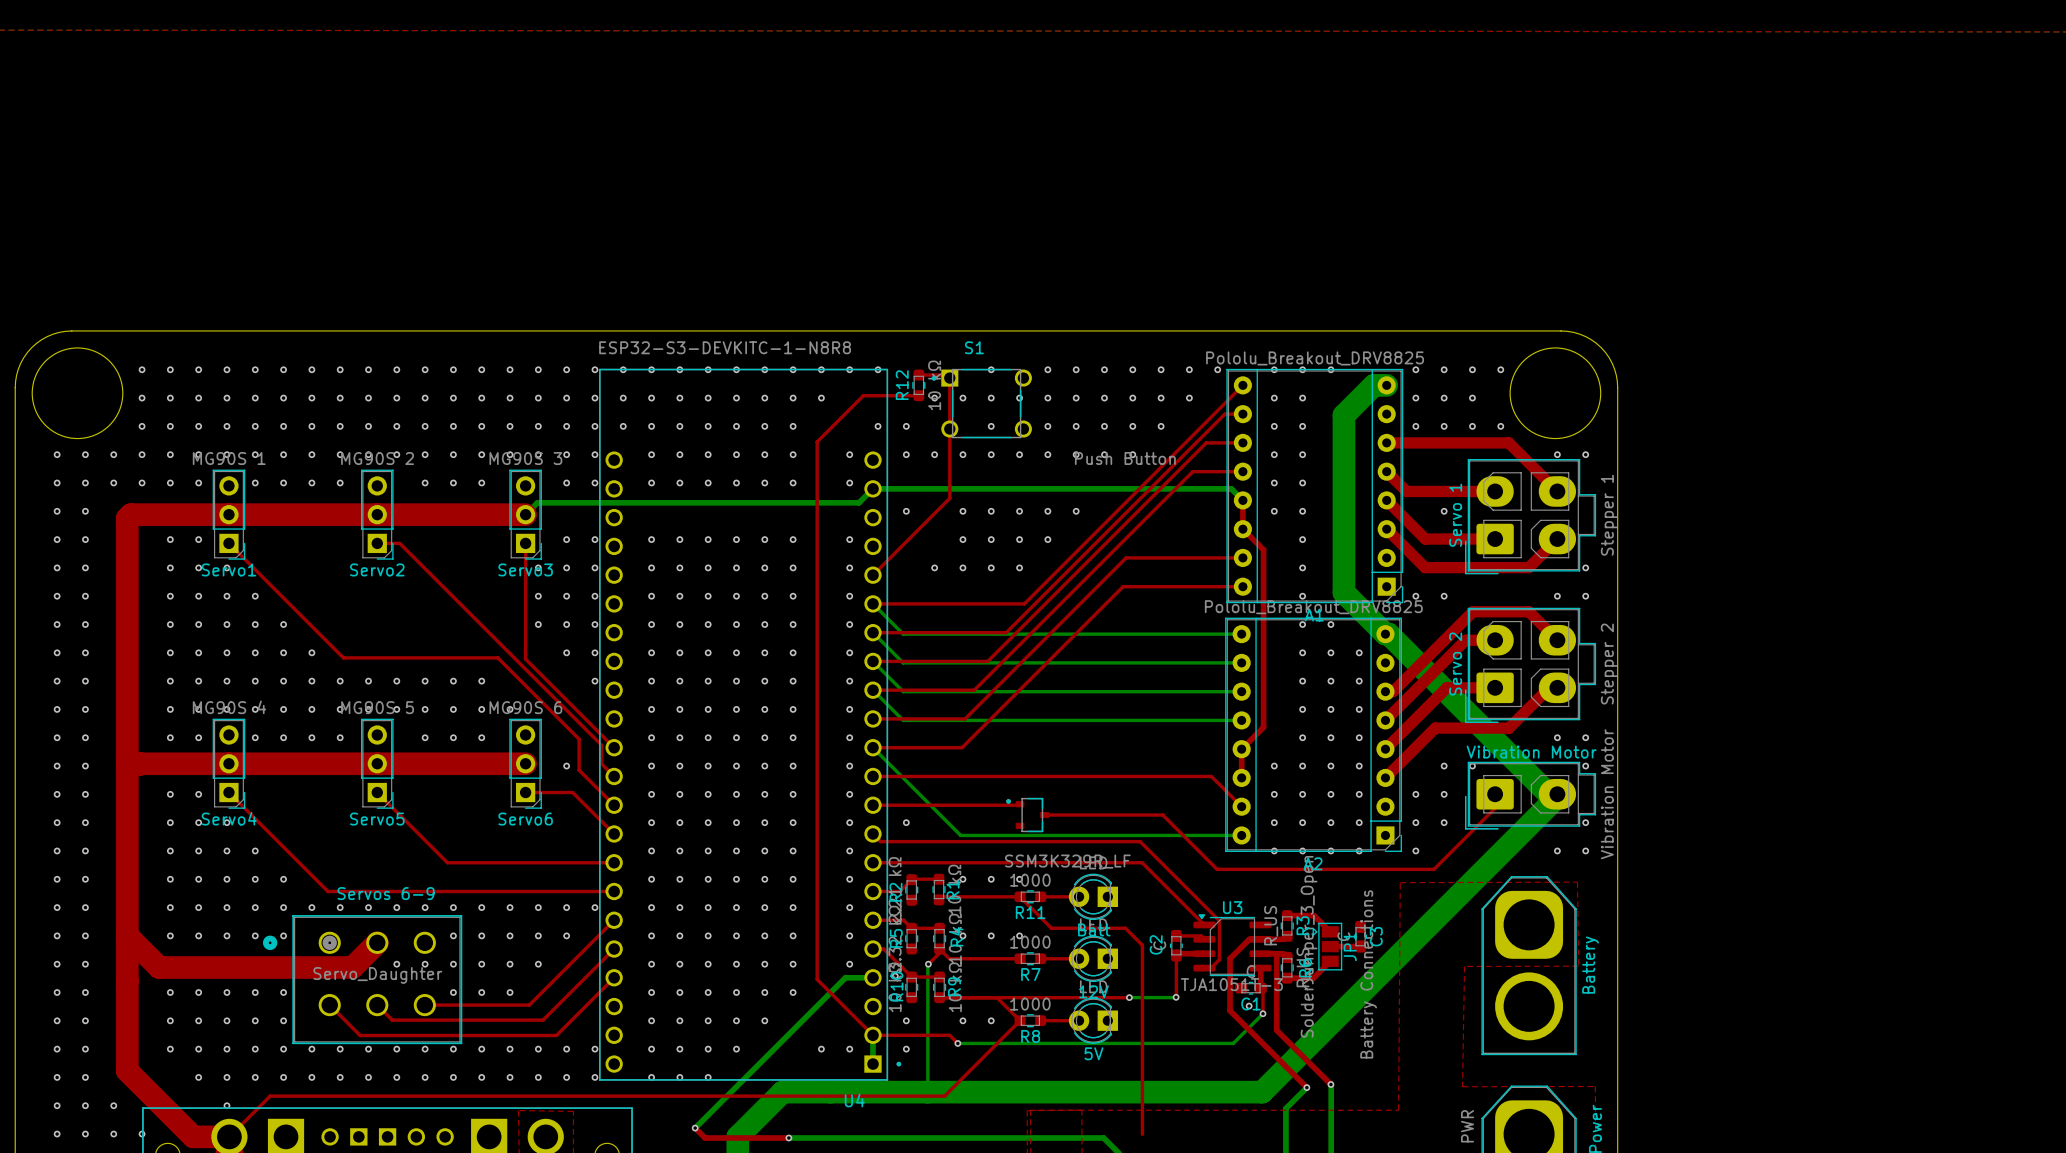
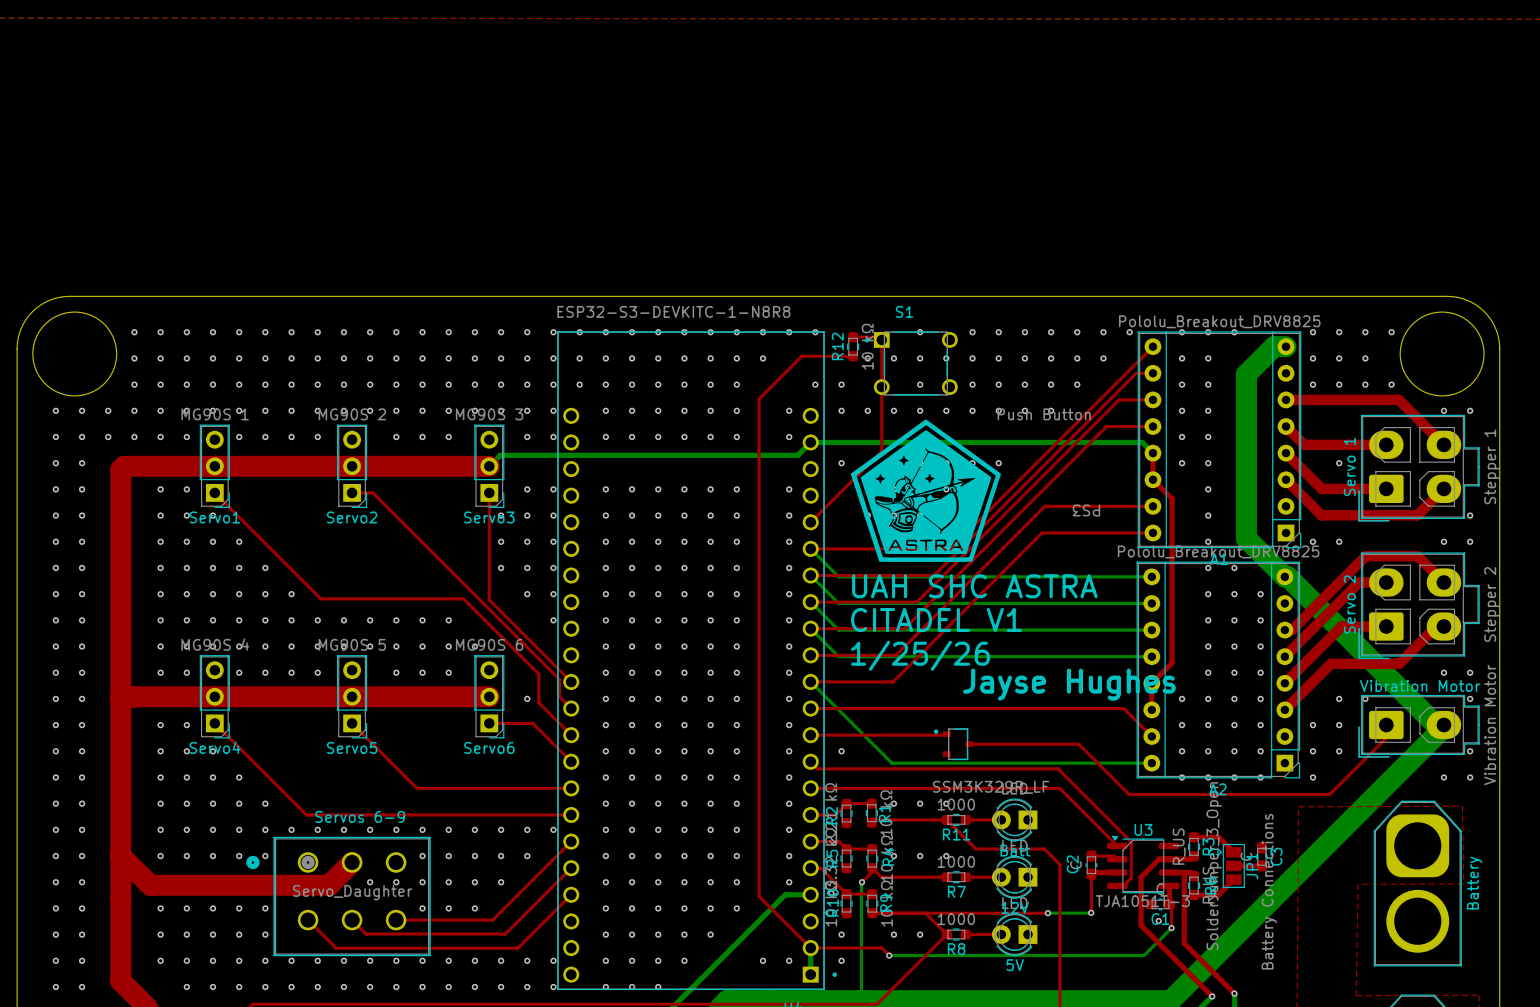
drawing: none -> [850, 419, 1002, 562]
text: none -> PS3 (1086, 510)
text: none -> UAH SHC ASTRA (974, 586)
text: none -> CITADEL V1 (936, 619)
text: none -> 1/25/26 (920, 655)
text: none -> Jayse Hughes (1069, 684)

